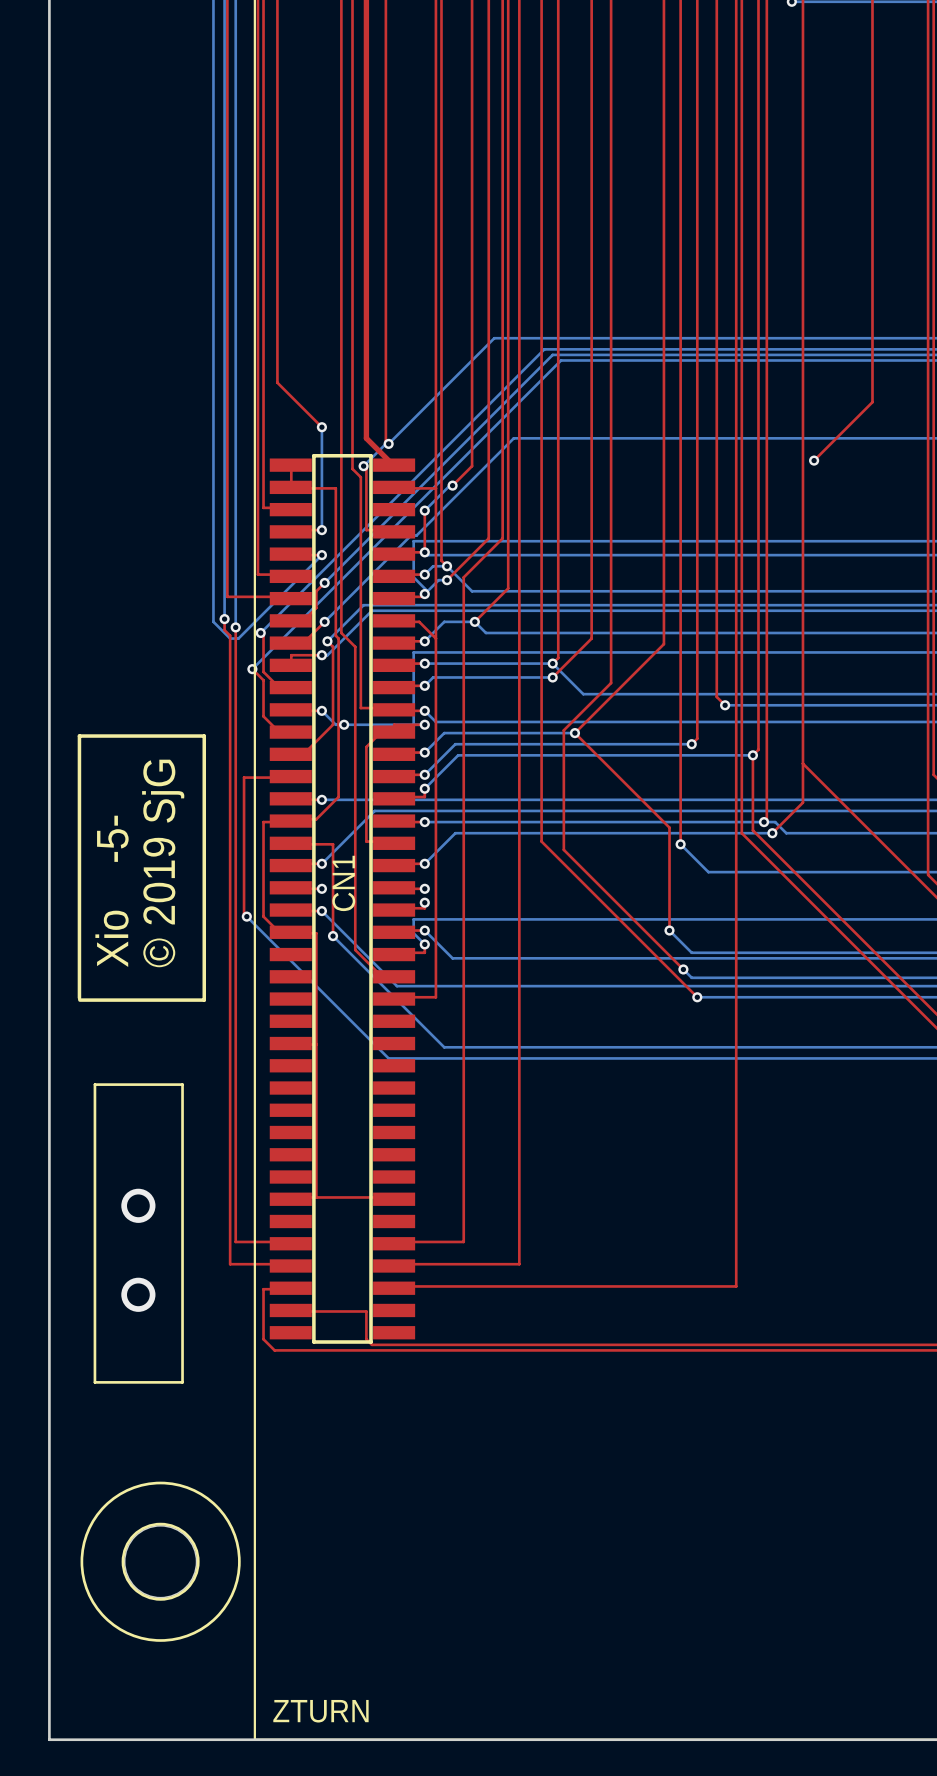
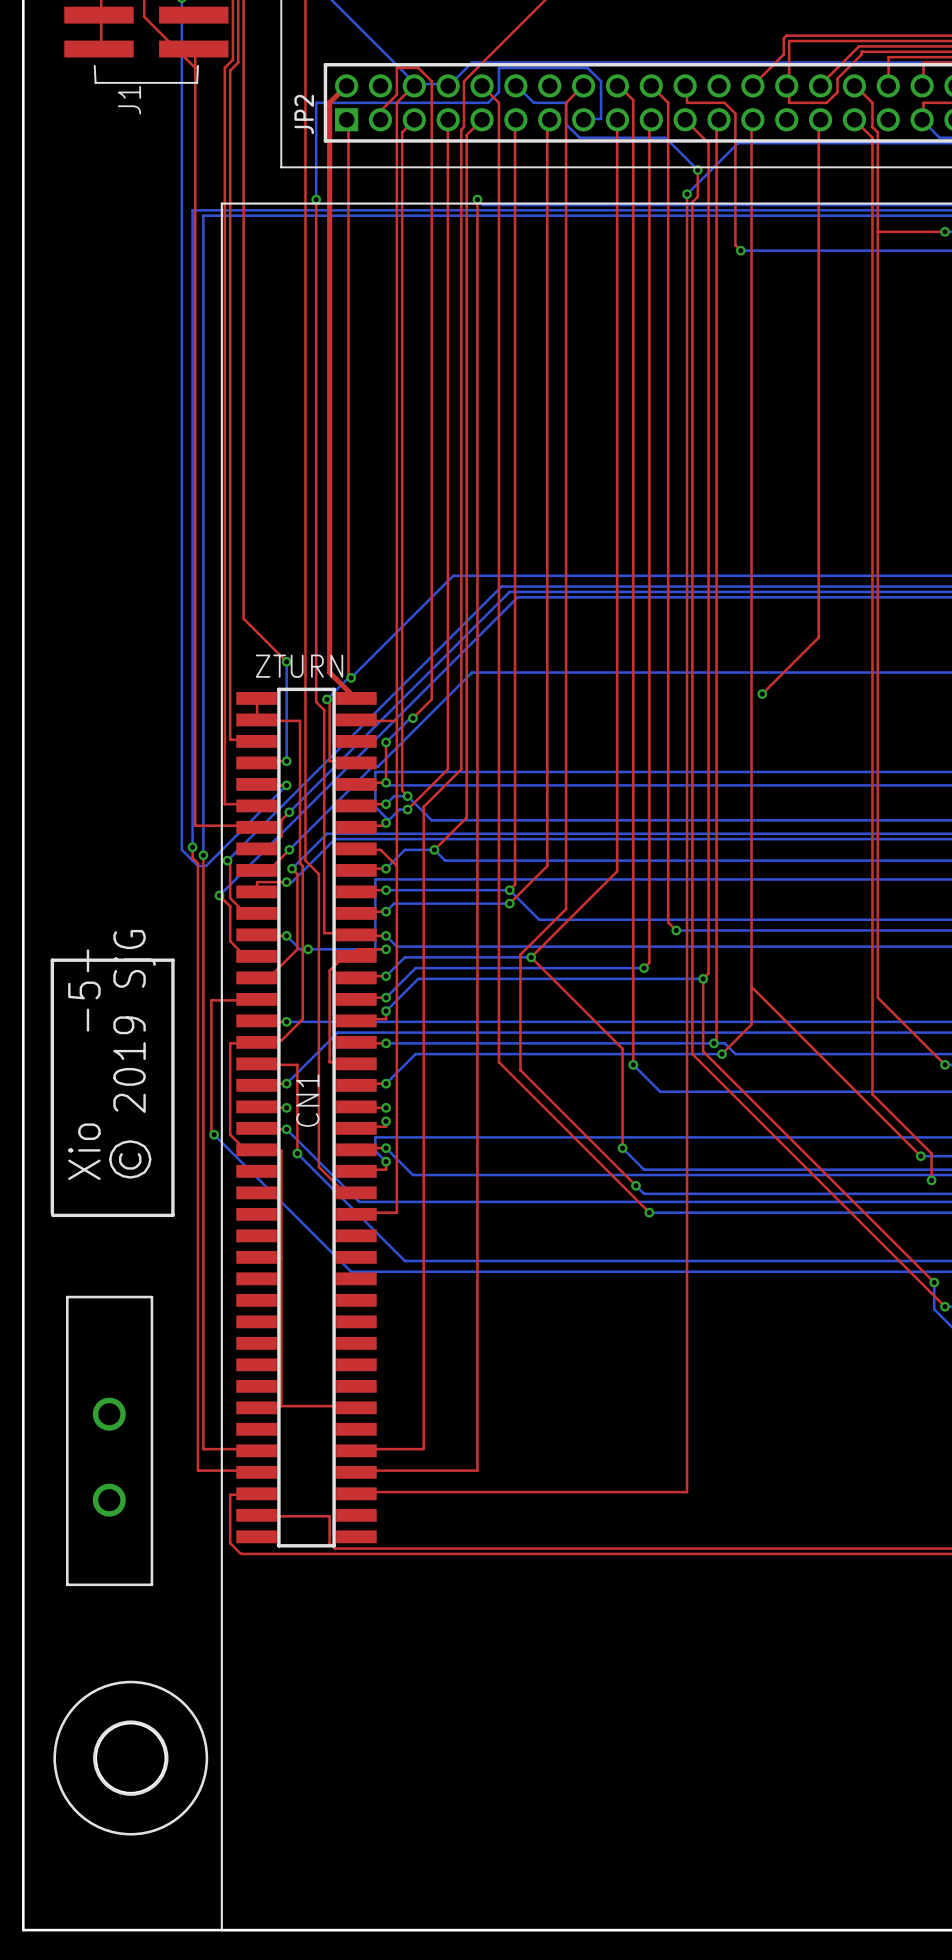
ZTURN name position: ZTURN (320, 1711) -> ZTURN (299, 666)

